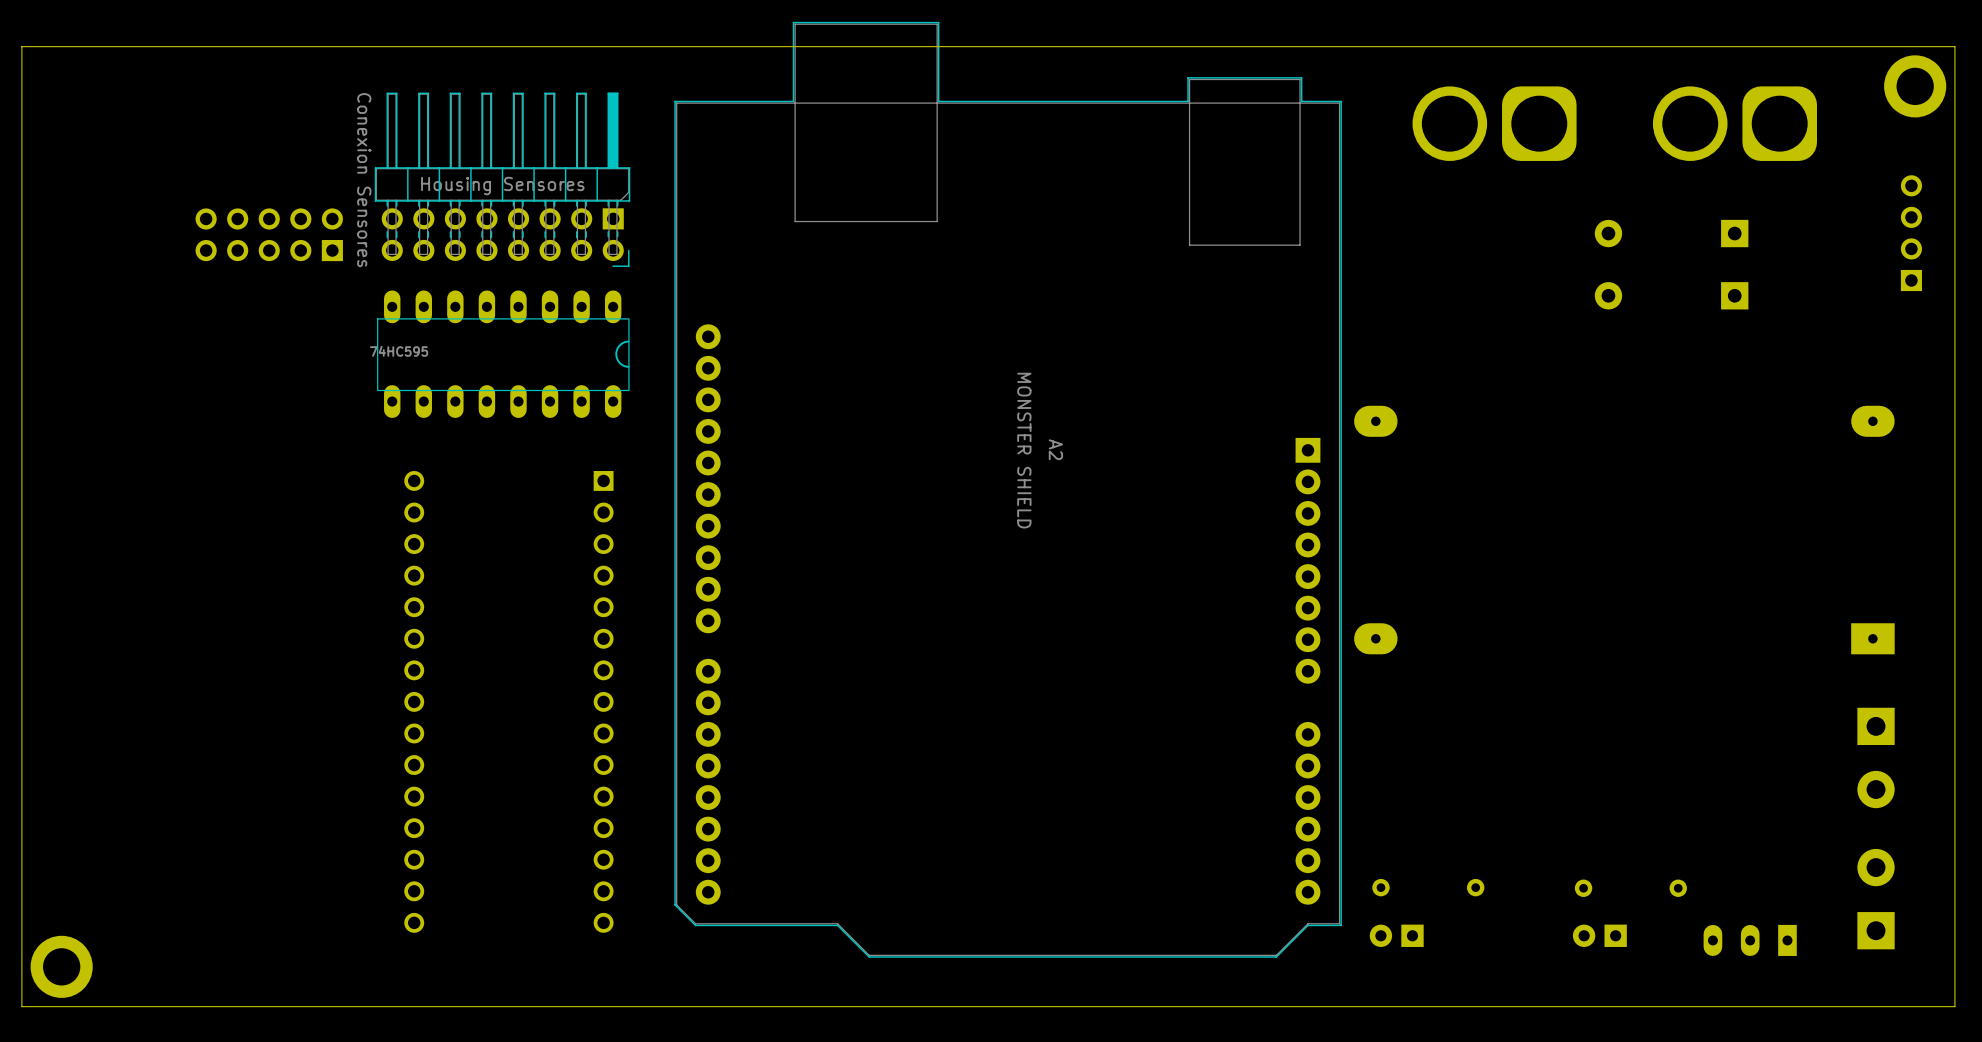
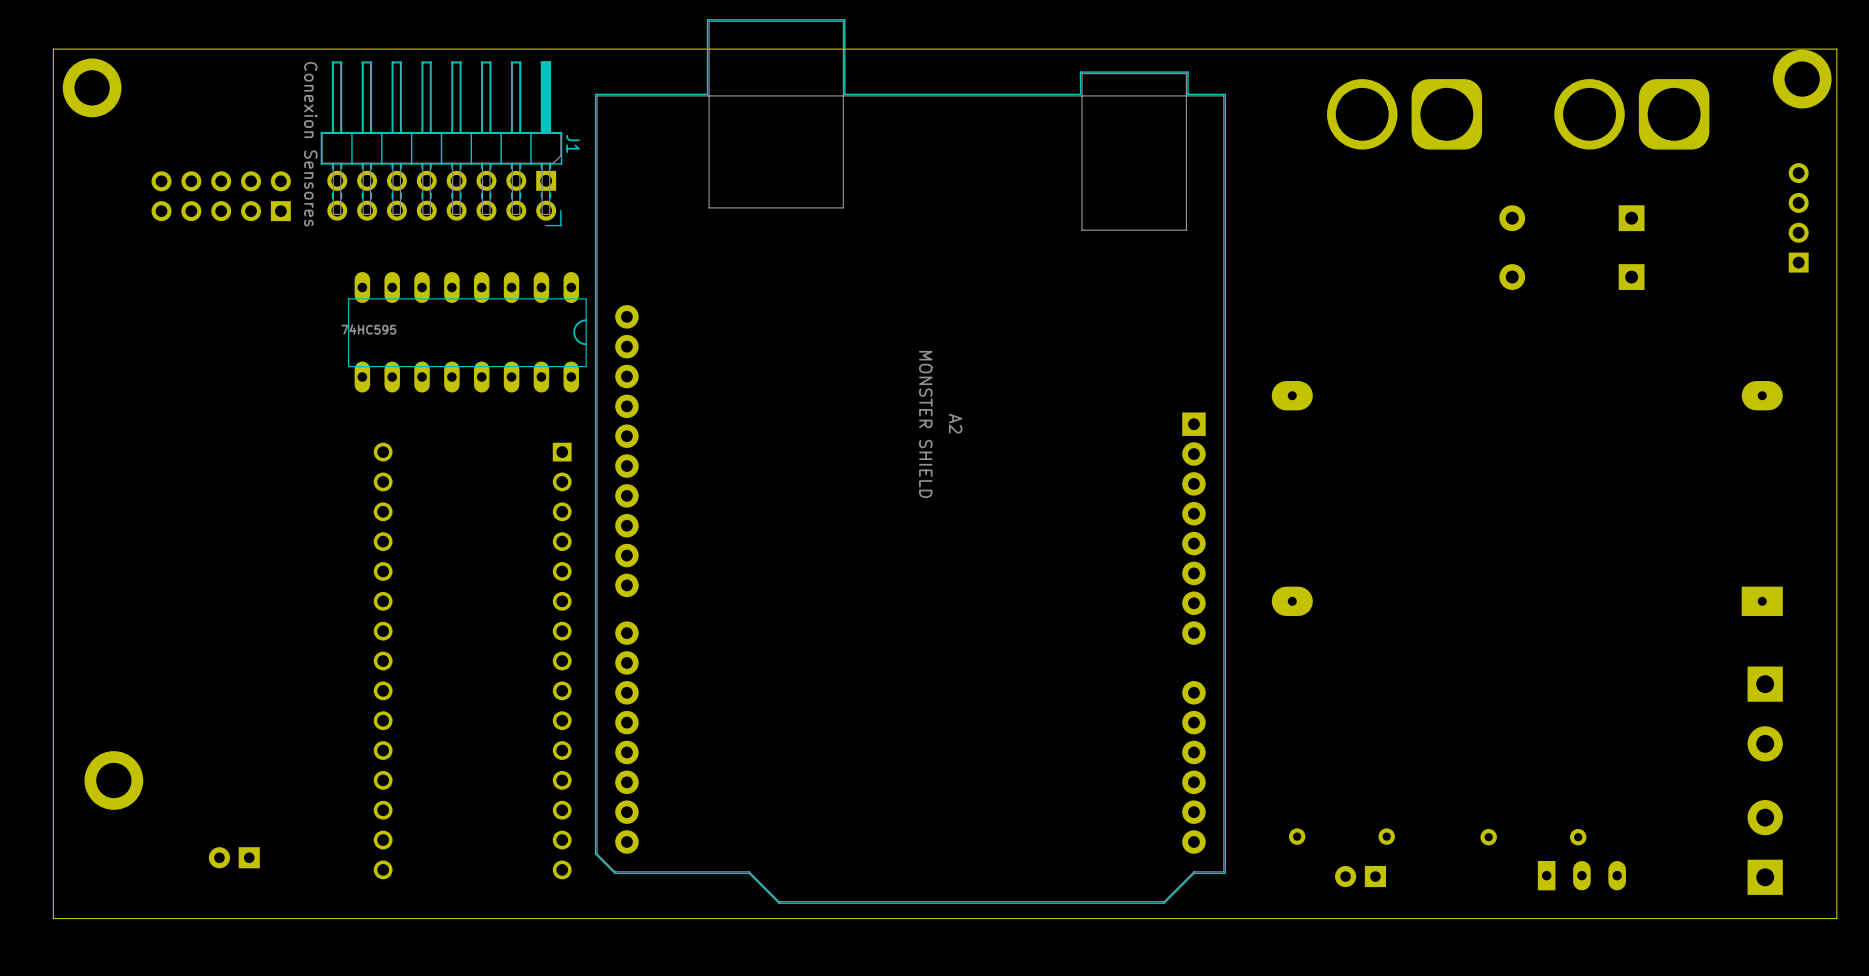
board edge: (1954, 46) (21, 46) (21, 1006) (1954, 1006) (1954, 46) -> (1836, 49) (1836, 918) (53, 918) (53, 49) (1836, 49)
part: none -> (92, 87)
J1: none -> Conexion Sensores (441, 143)
Housing Sensores: Conexion Sensores (502, 179) -> none
part position: (269, 234) -> (221, 196)
A2 position: (1008, 489) -> (910, 461)
part: none -> (234, 857)
part position: (1396, 935) -> (1360, 876)
part: (1599, 935) -> none
part rotation: 0° (1750, 940) -> 180° (1581, 875)
part position: (1750, 940) -> (1581, 875)
part position: (61, 966) -> (113, 780)

